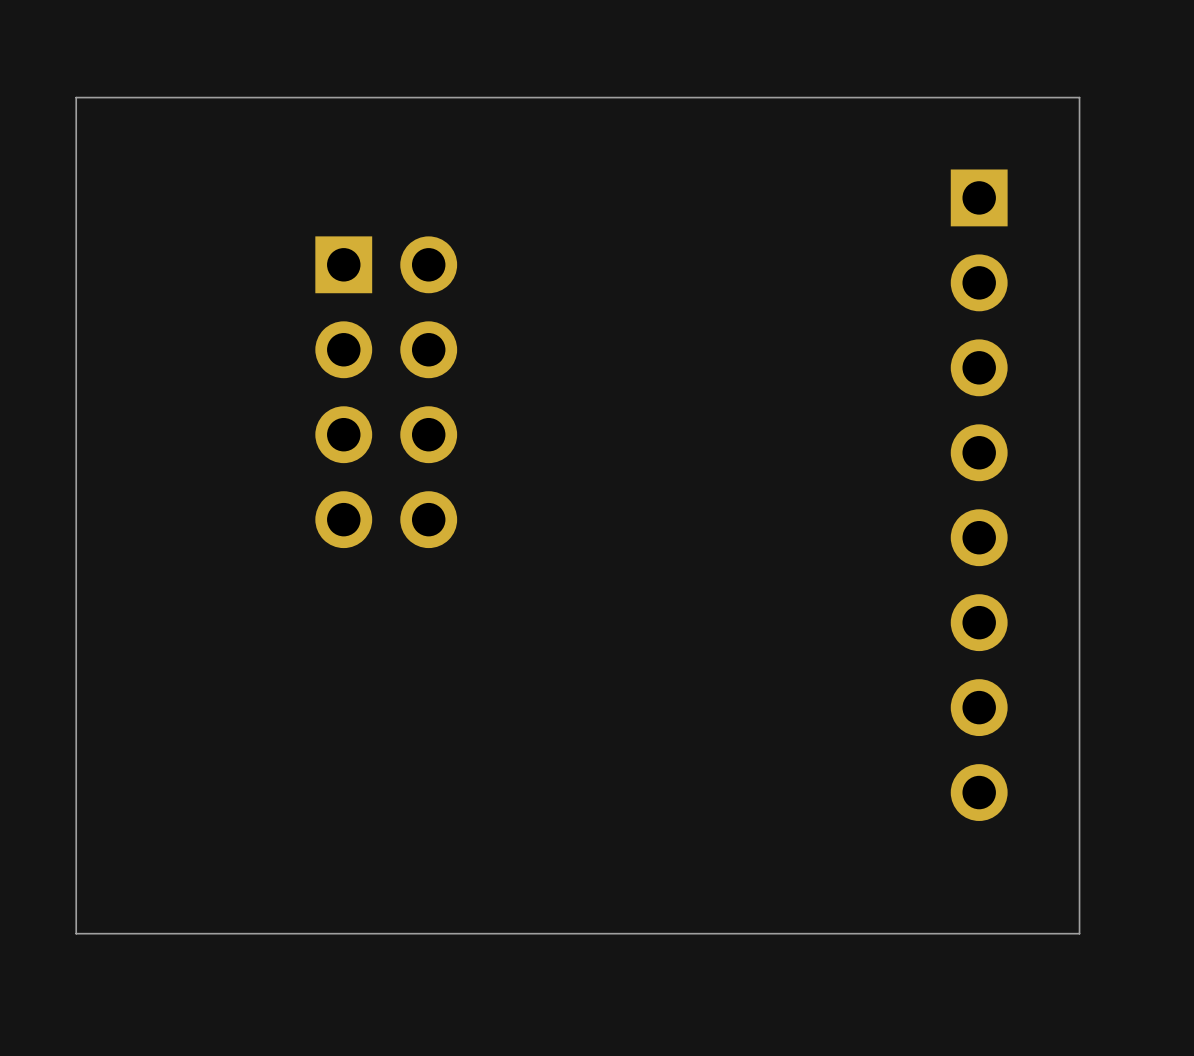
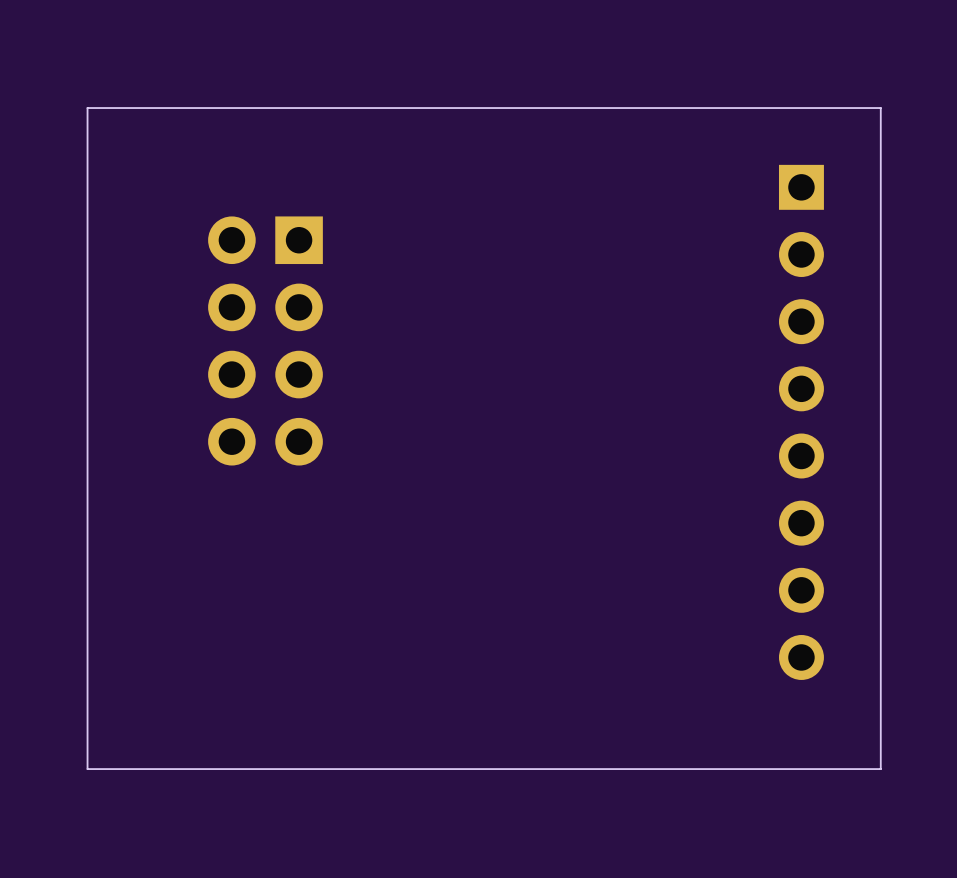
part: none -> (265, 340)
part: (386, 392) -> none

